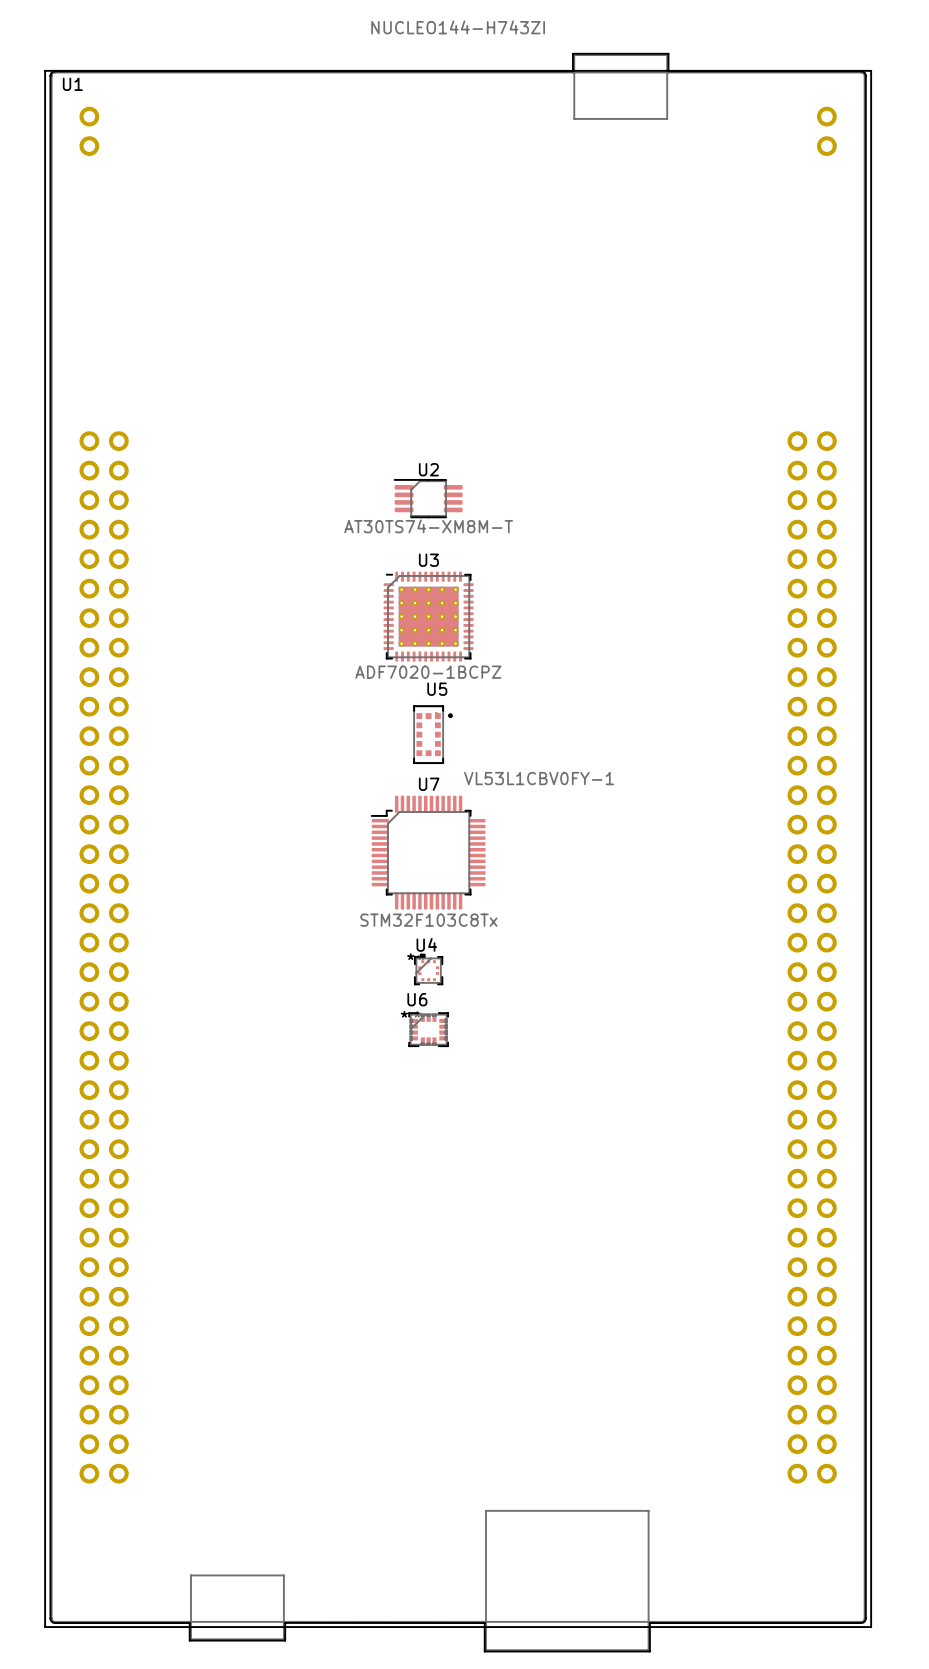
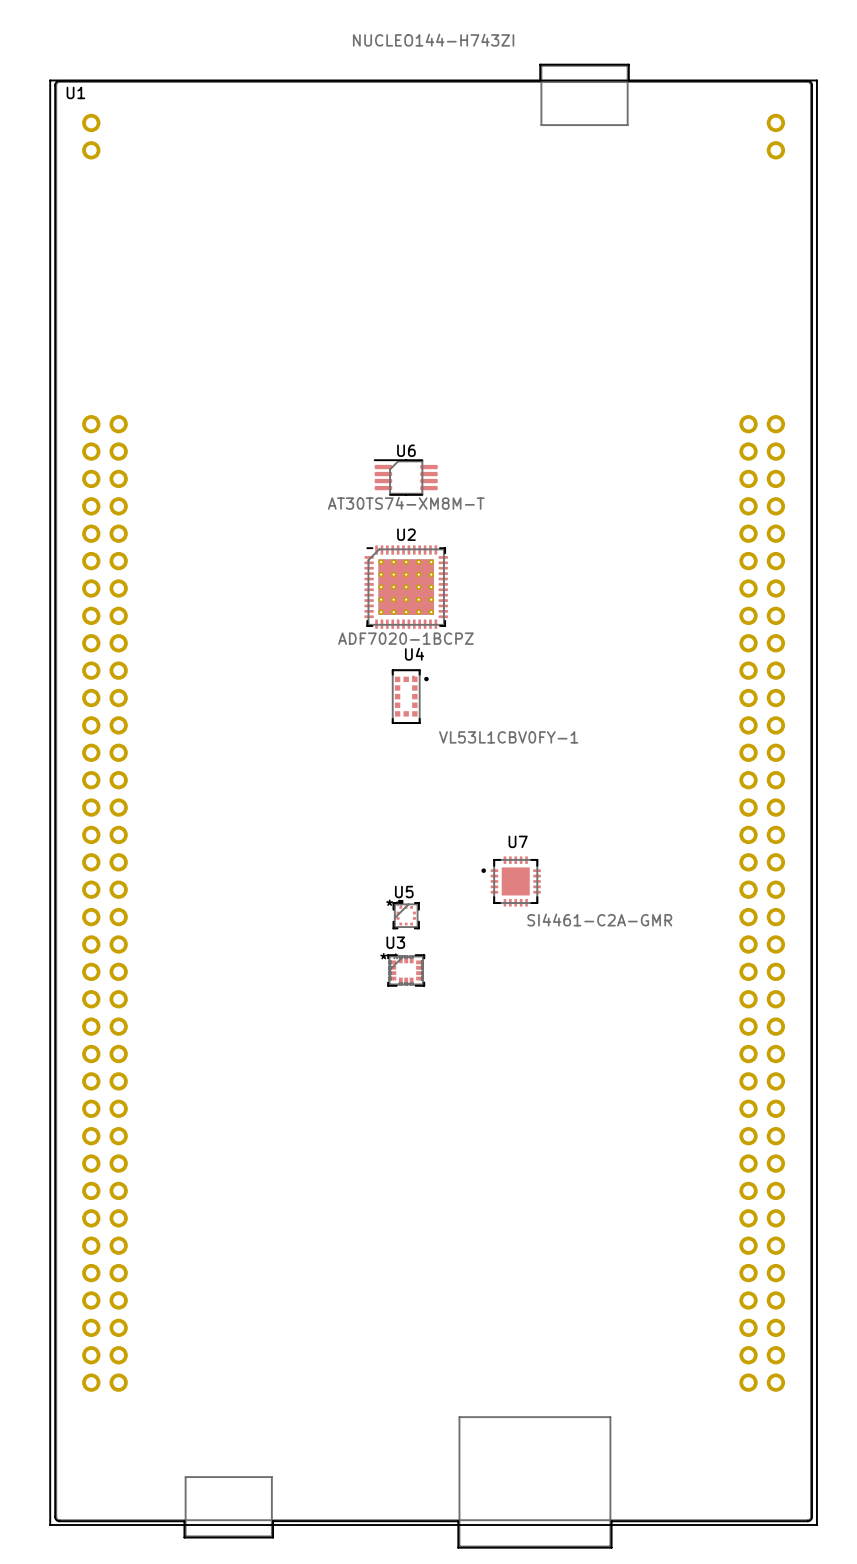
U2 name: U2 (428, 469) -> U6 (406, 450)
U3 name: U3 (428, 560) -> U2 (406, 534)
U5 name: U5 (437, 689) -> U4 (414, 654)
U7 name position: U7 (429, 784) -> U7 (518, 841)
U7 footprint: [371, 795, 486, 910] -> [481, 856, 541, 907]
U7 value: STM32F103C8Tx (428, 920) -> SI4461-C2A-GMR (599, 920)
U4 name: U4 (426, 944) -> U5 (404, 892)
U6 name: U6 (417, 999) -> U3 (395, 942)

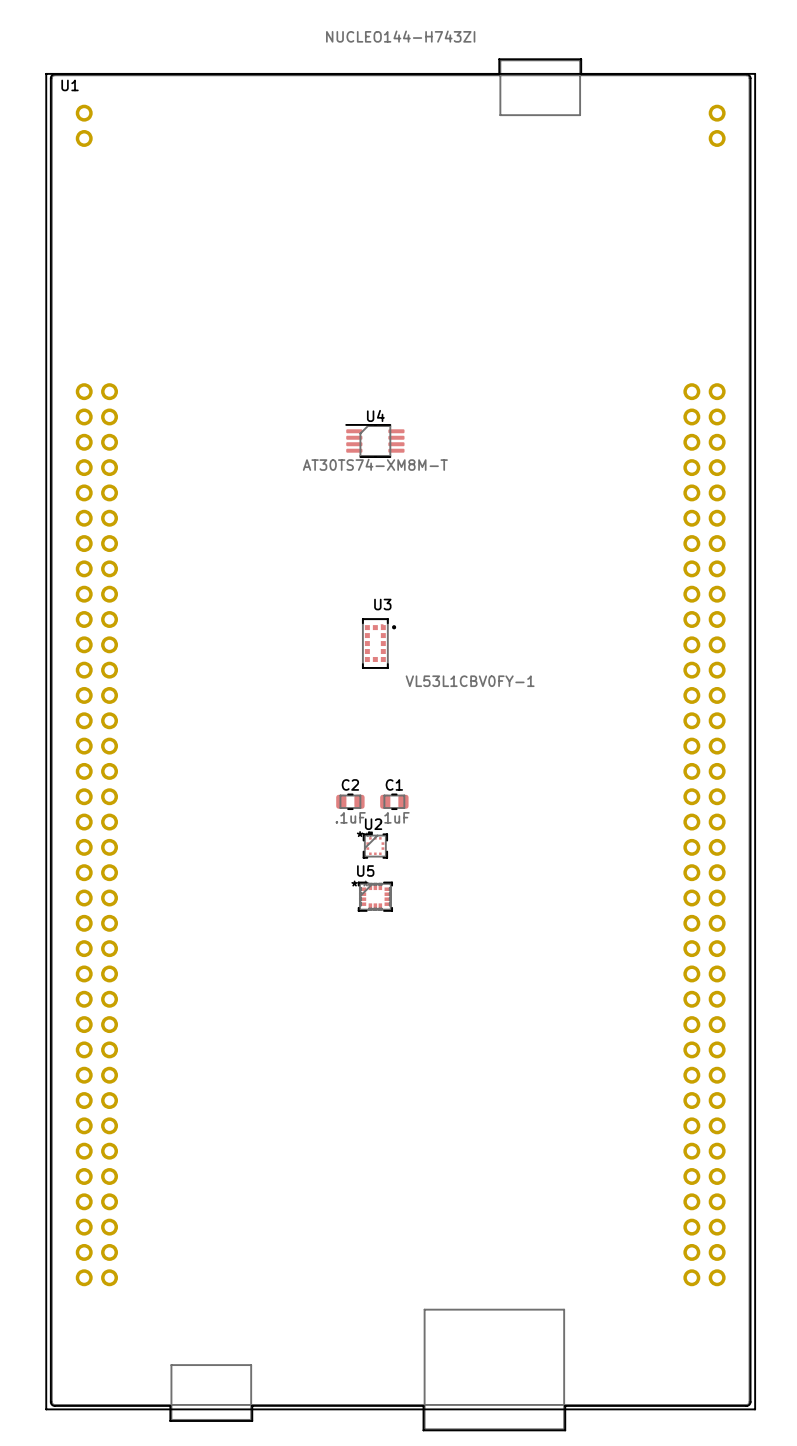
U6 name: U6 (406, 450) -> U4 (375, 415)
U2: ADF7020-1BCPZ (406, 587) -> none
U4 name: U4 (414, 654) -> U3 (382, 604)
C2: none -> .1uF (350, 801)
C1: none -> .1uF (394, 801)
U7: SI4461-C2A-GMR (511, 881) -> none
U5 name: U5 (404, 892) -> U2 (373, 824)
U3 name: U3 (395, 942) -> U5 (365, 871)

